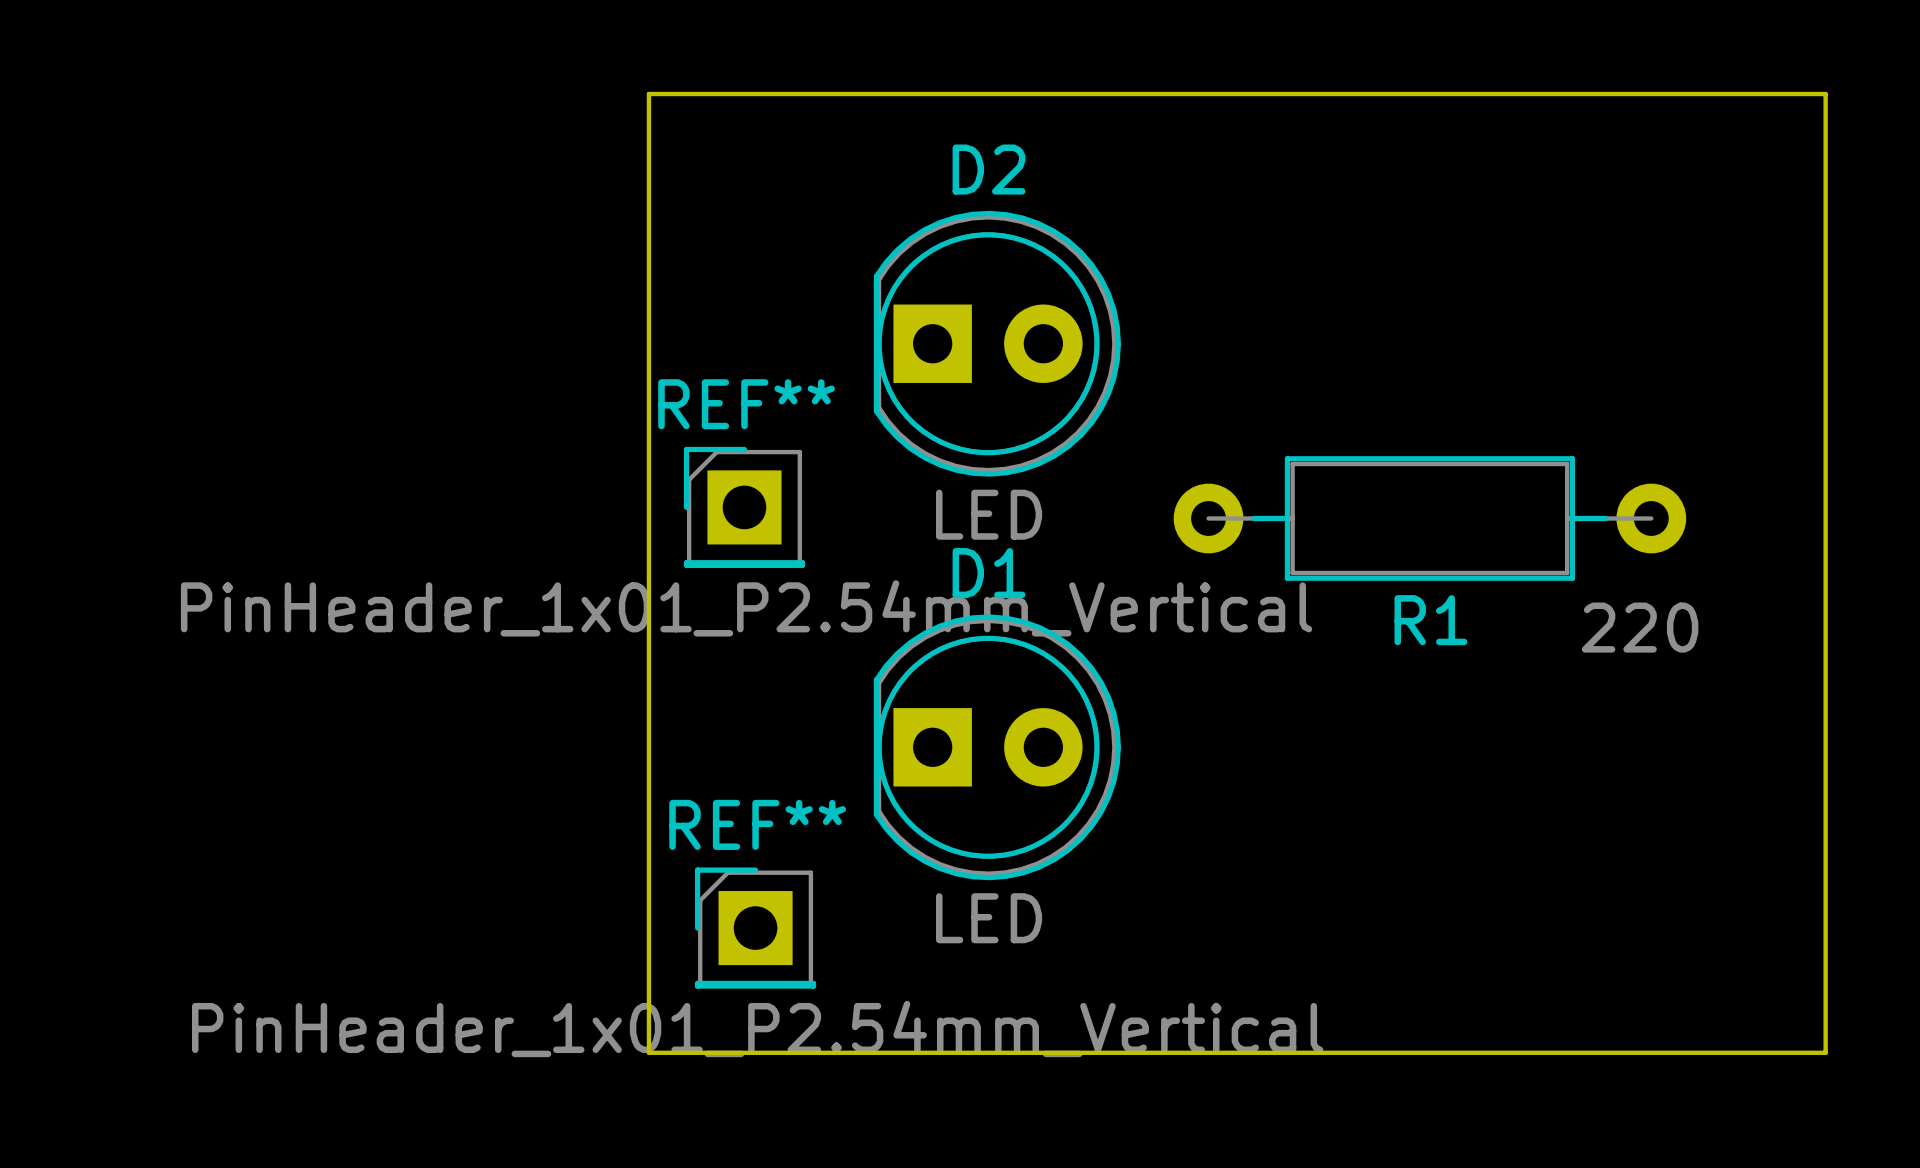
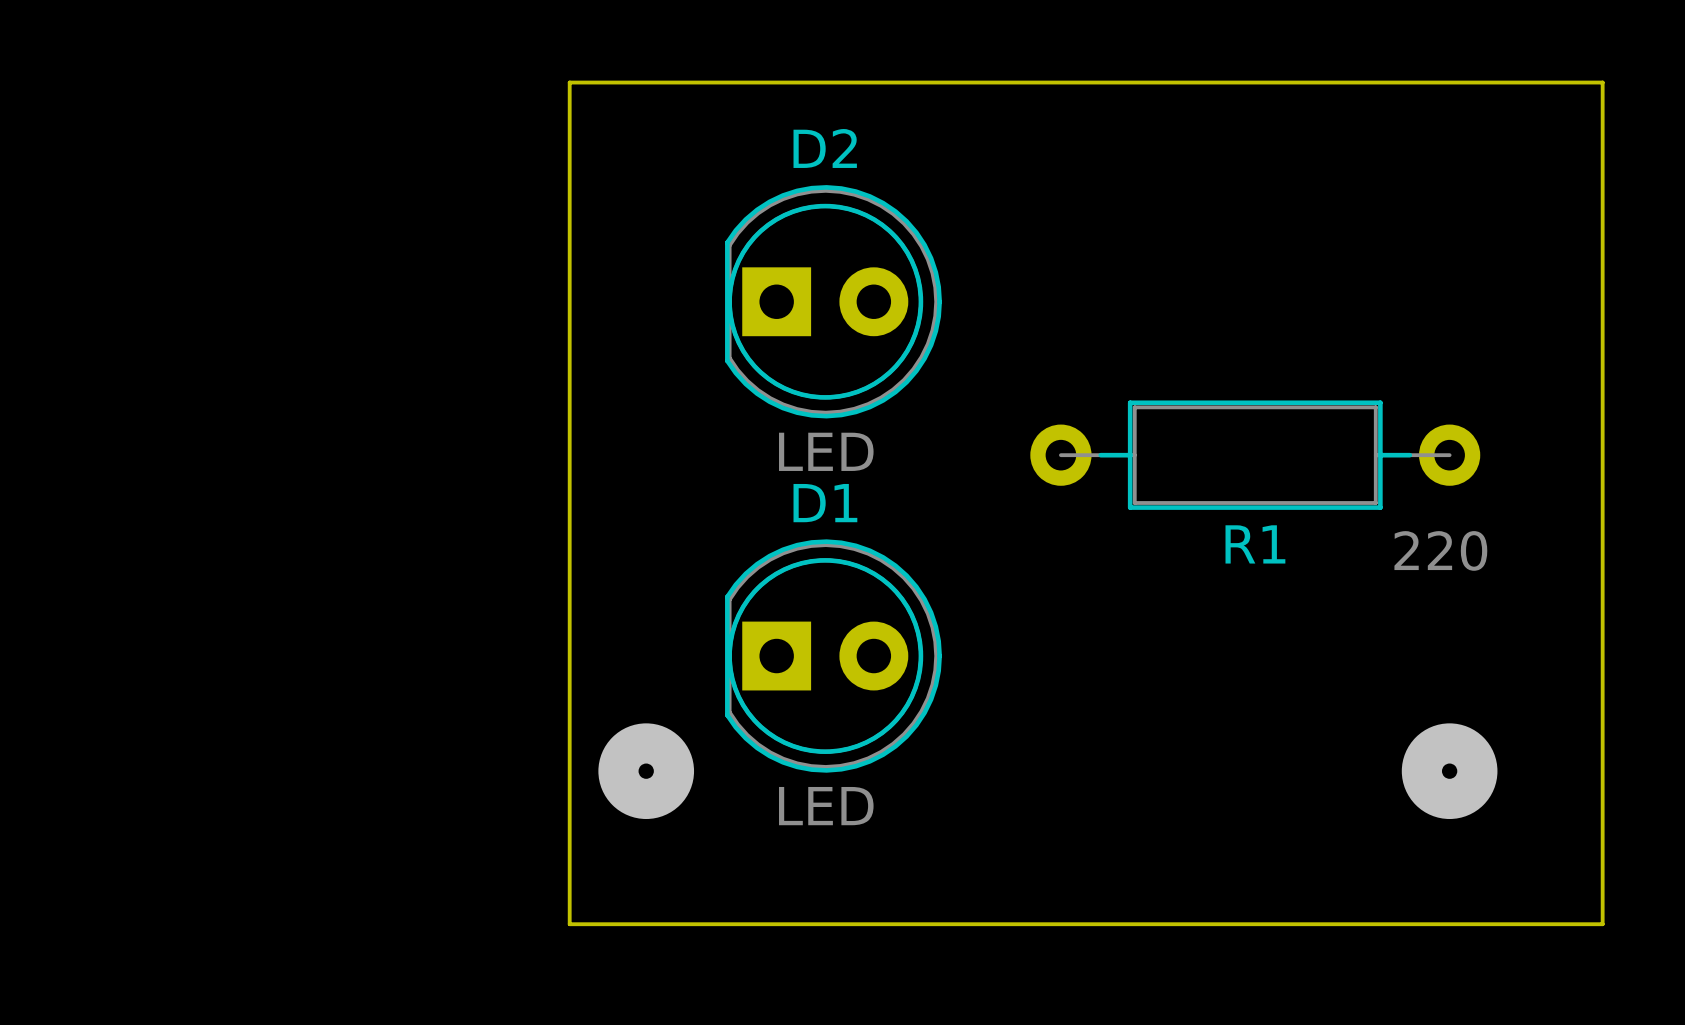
D2 position: (997, 343) -> (833, 301)
REF**: PinHeader_1x01_P2.54mm_Vertical (744, 507) -> none
D1 position: (997, 747) -> (833, 656)
via: none -> (646, 771)
via: none -> (1449, 771)
REF**: PinHeader_1x01_P2.54mm_Vertical (755, 928) -> none

